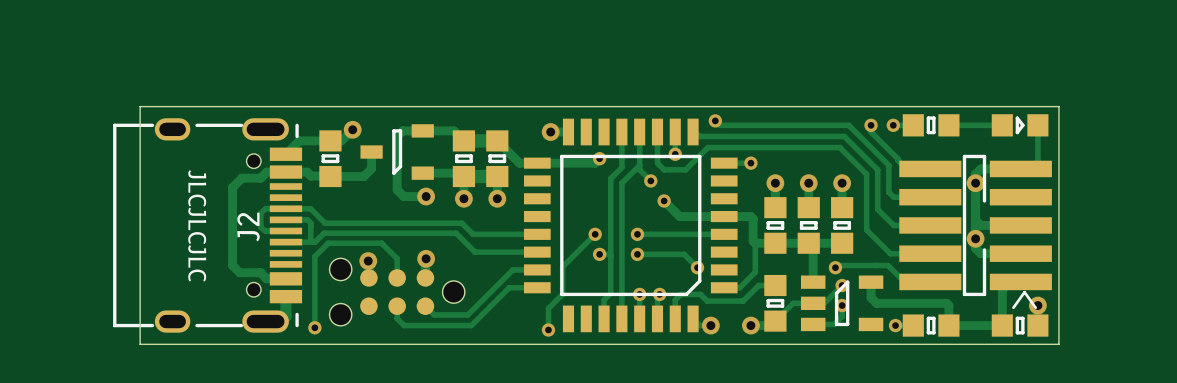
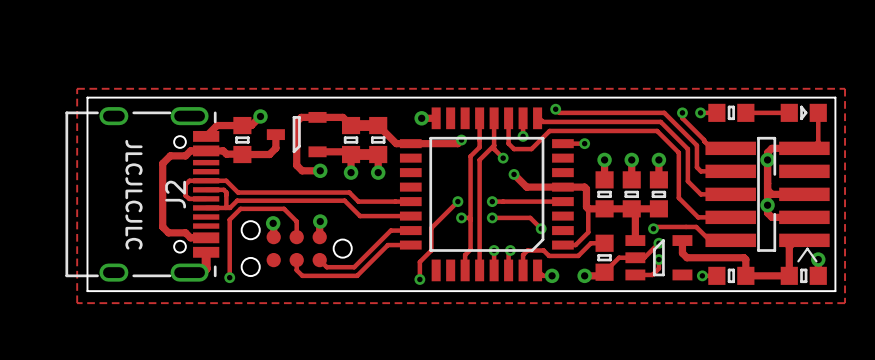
zone outline: none -> (77, 88) (845, 88) (845, 303) (77, 303) (77, 88)

